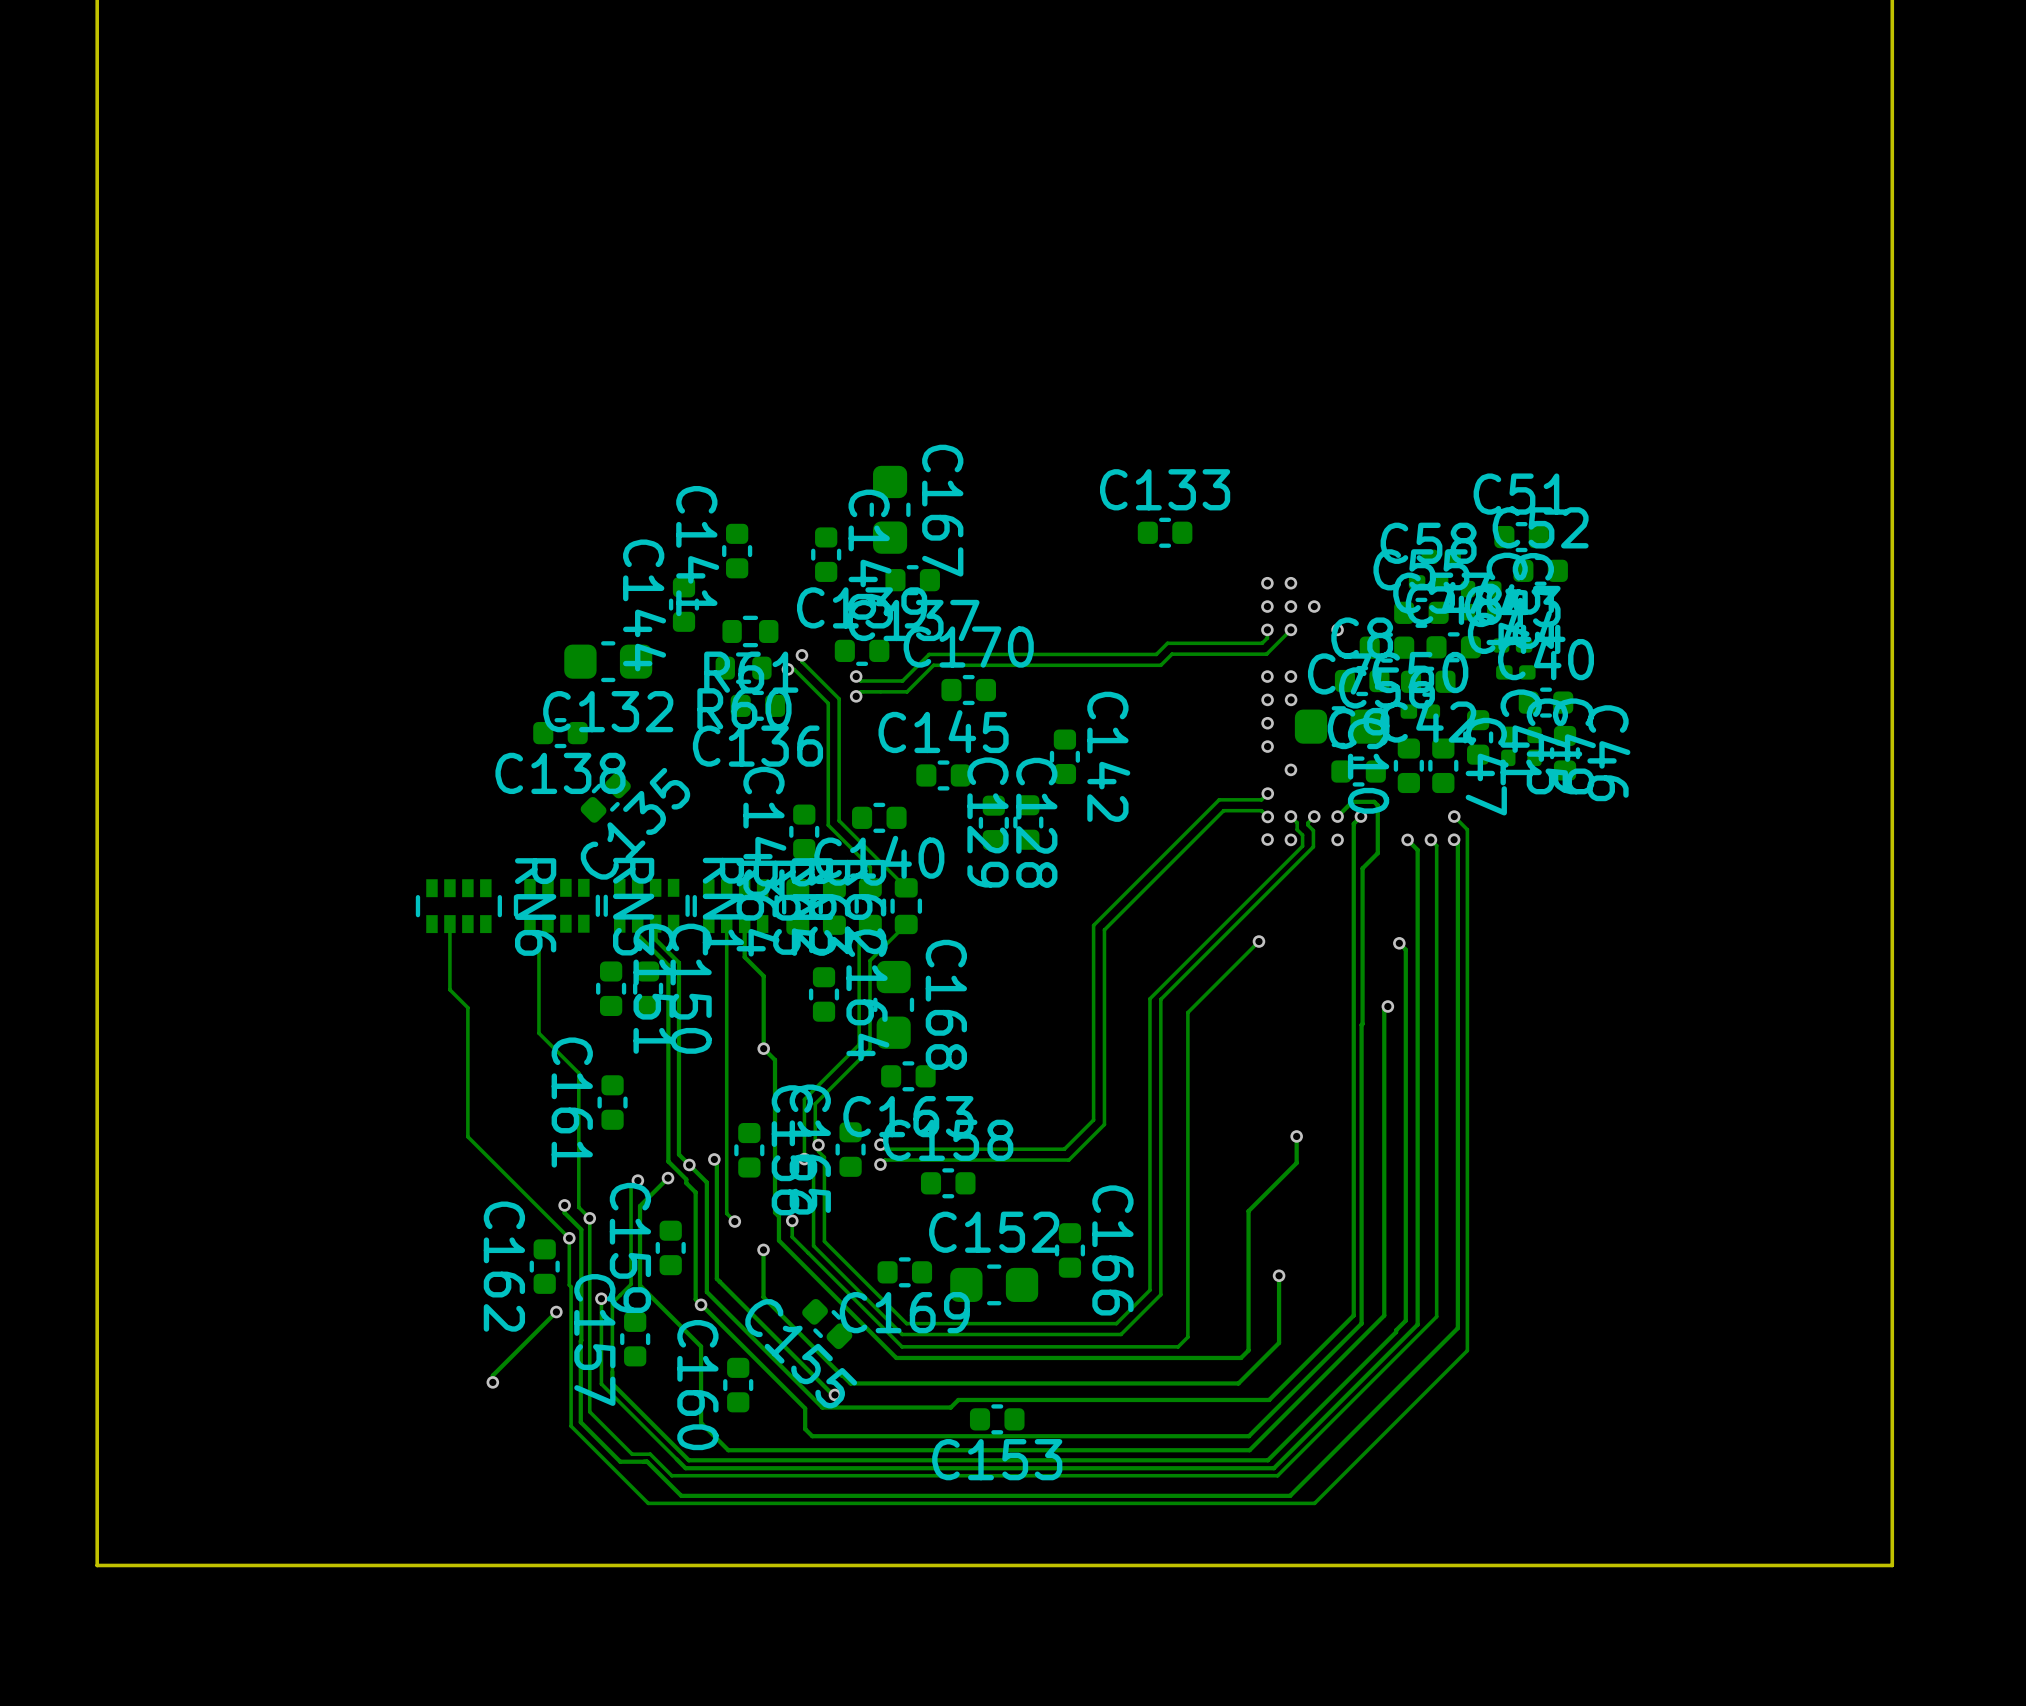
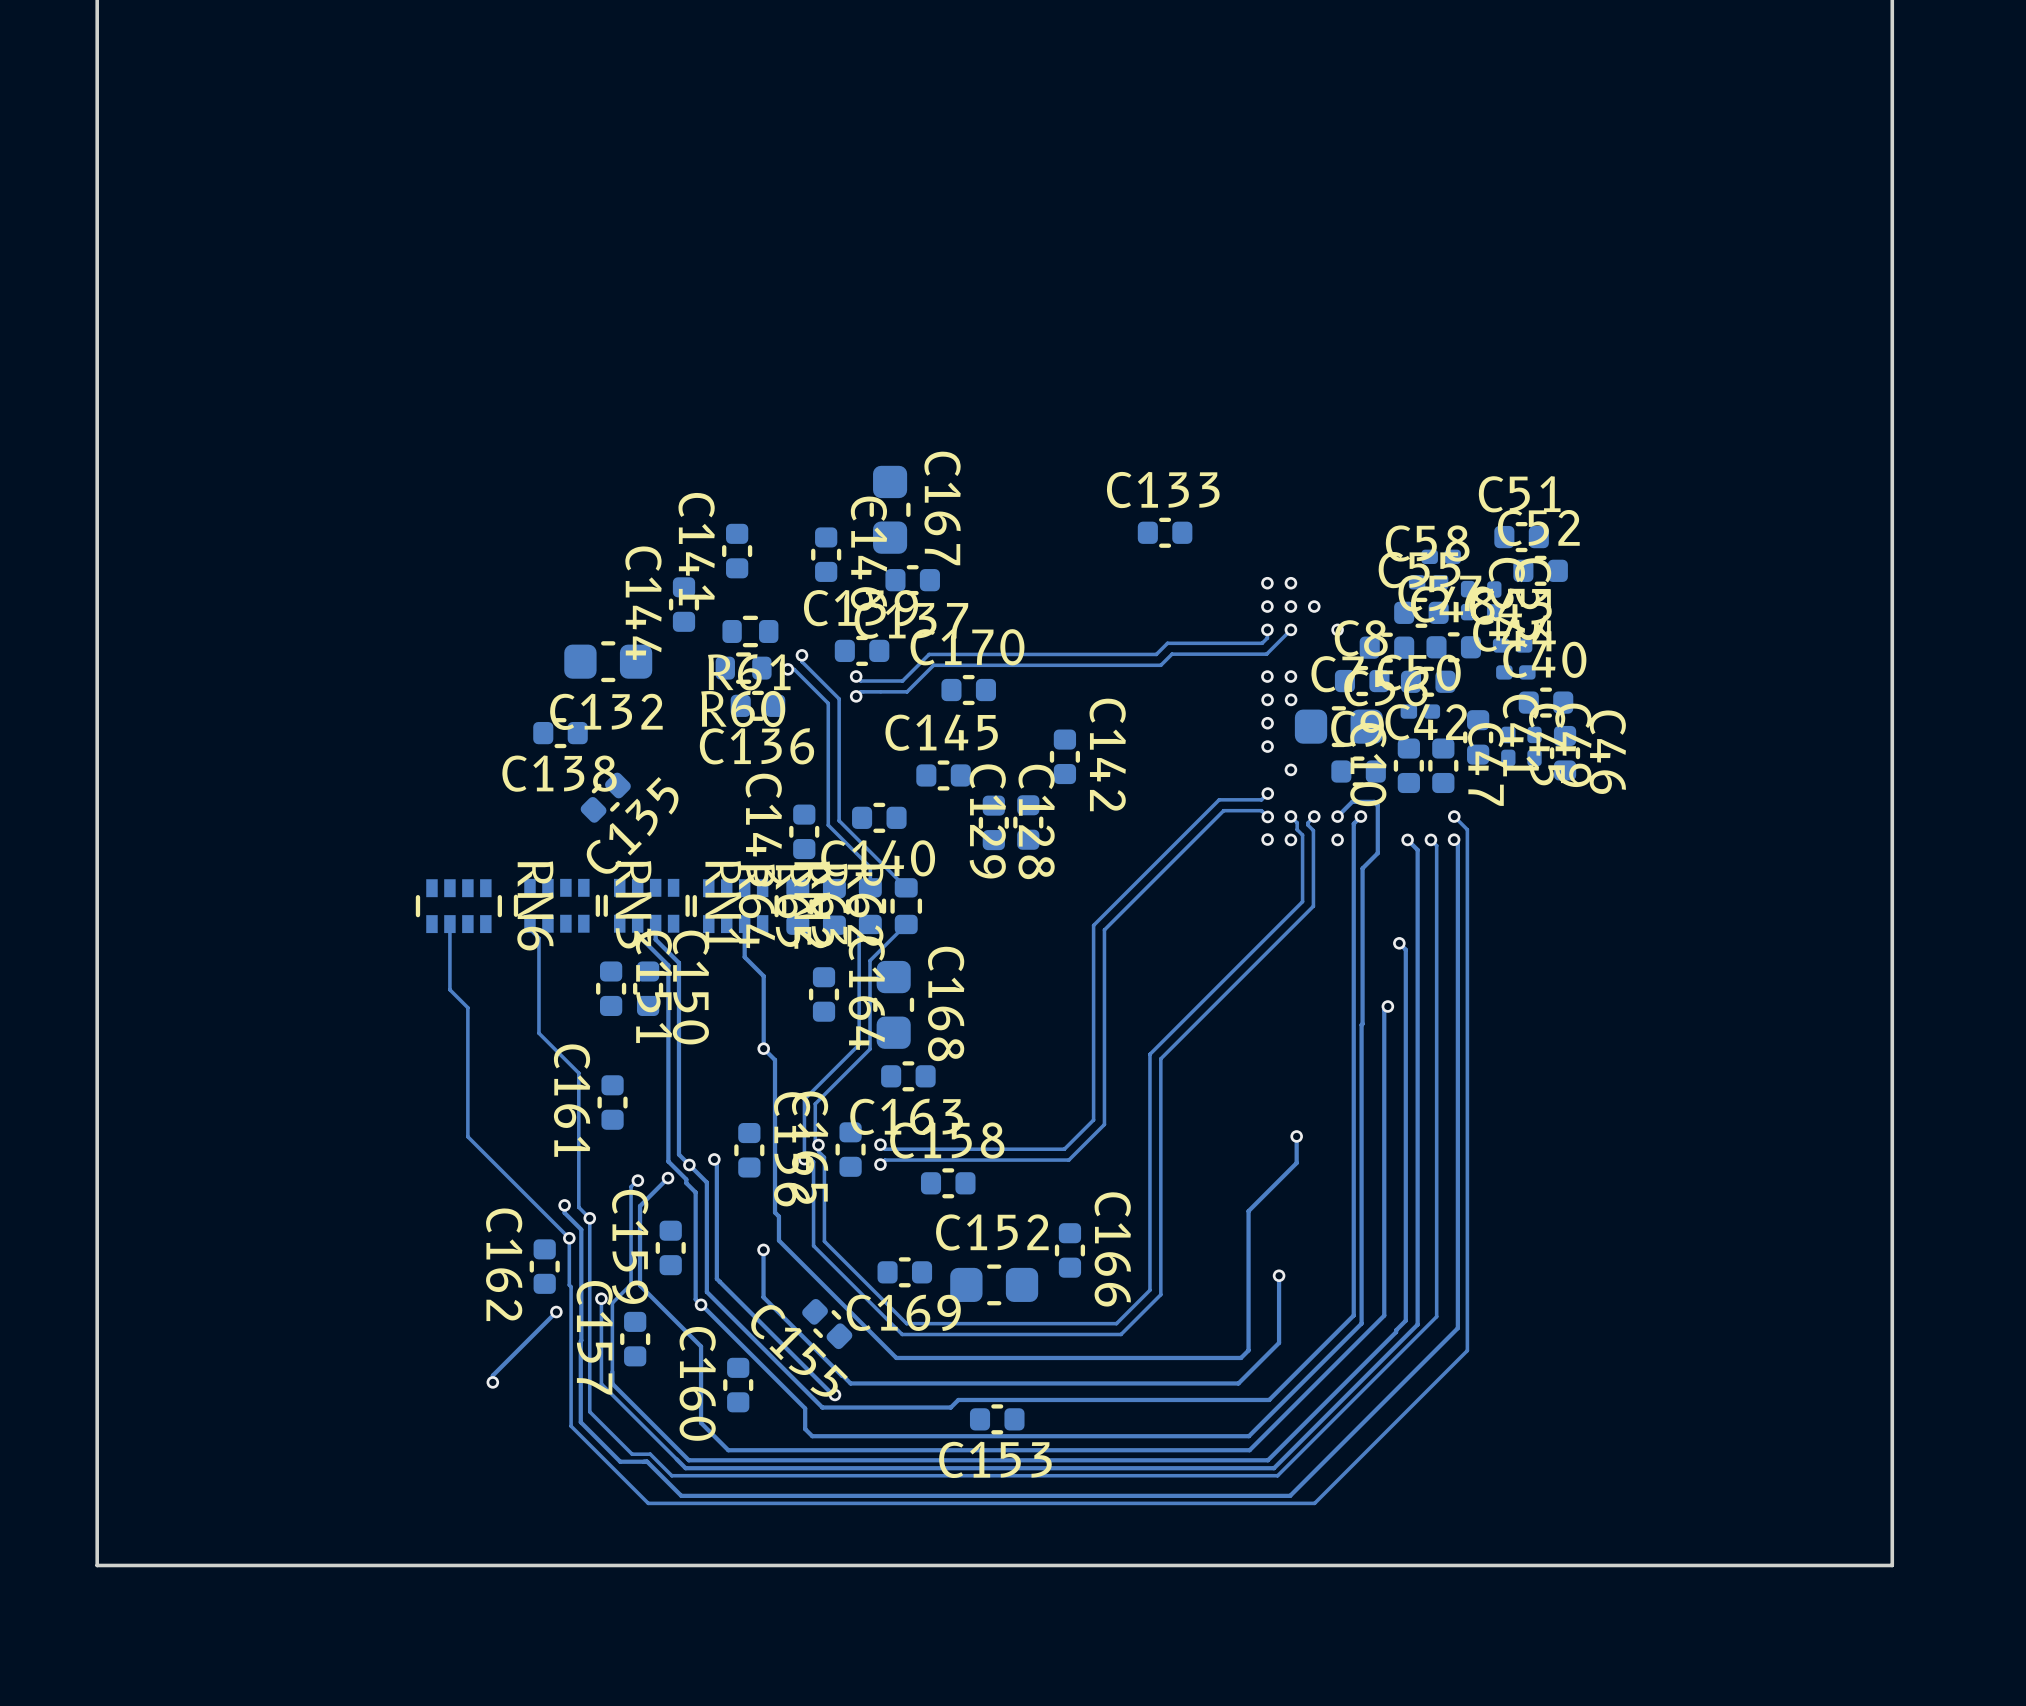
track: (1302, 846) (1149, 998) (1149, 1054) -> (1302, 846) (1302, 901) (1149, 1054)
track: (1313, 846) (1160, 999) (1160, 1058) -> (1313, 846) (1313, 906) (1160, 1058)
track: (726, 924) (726, 1213) (734, 1221) -> none
track: (1258, 941) (1187, 1012) (1187, 1337) (1178, 1346) (902, 1346) (792, 1236) (792, 1220) -> none
via: (1258, 941) -> none
via: (792, 1220) -> none
via: (734, 1221) -> none

